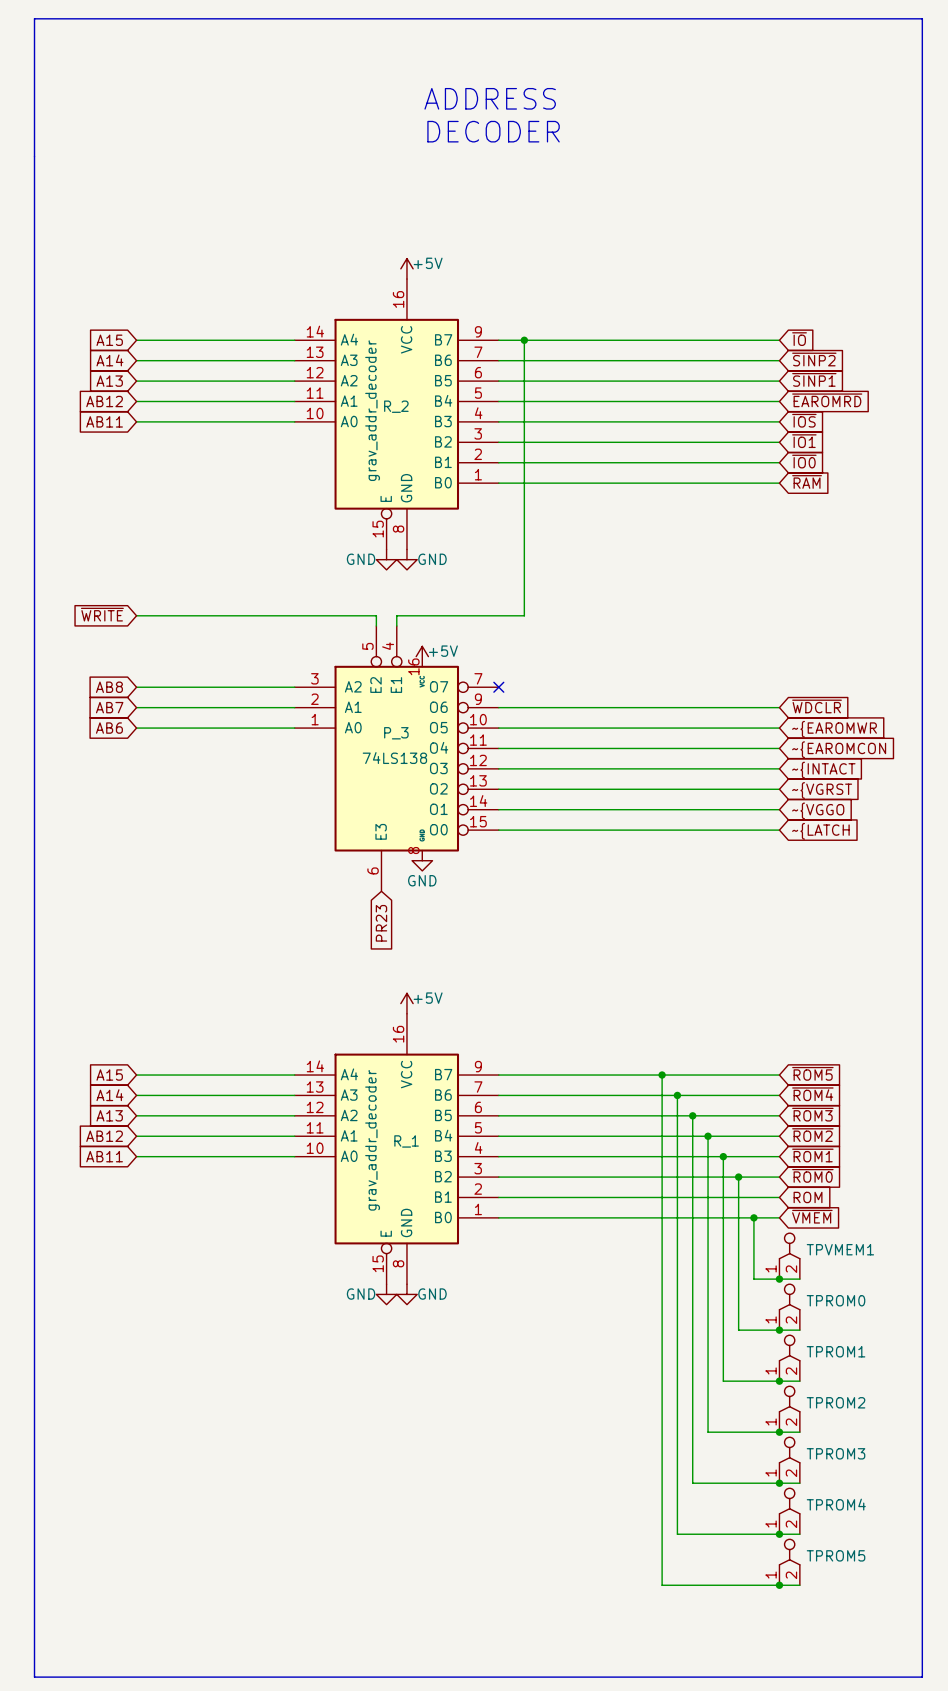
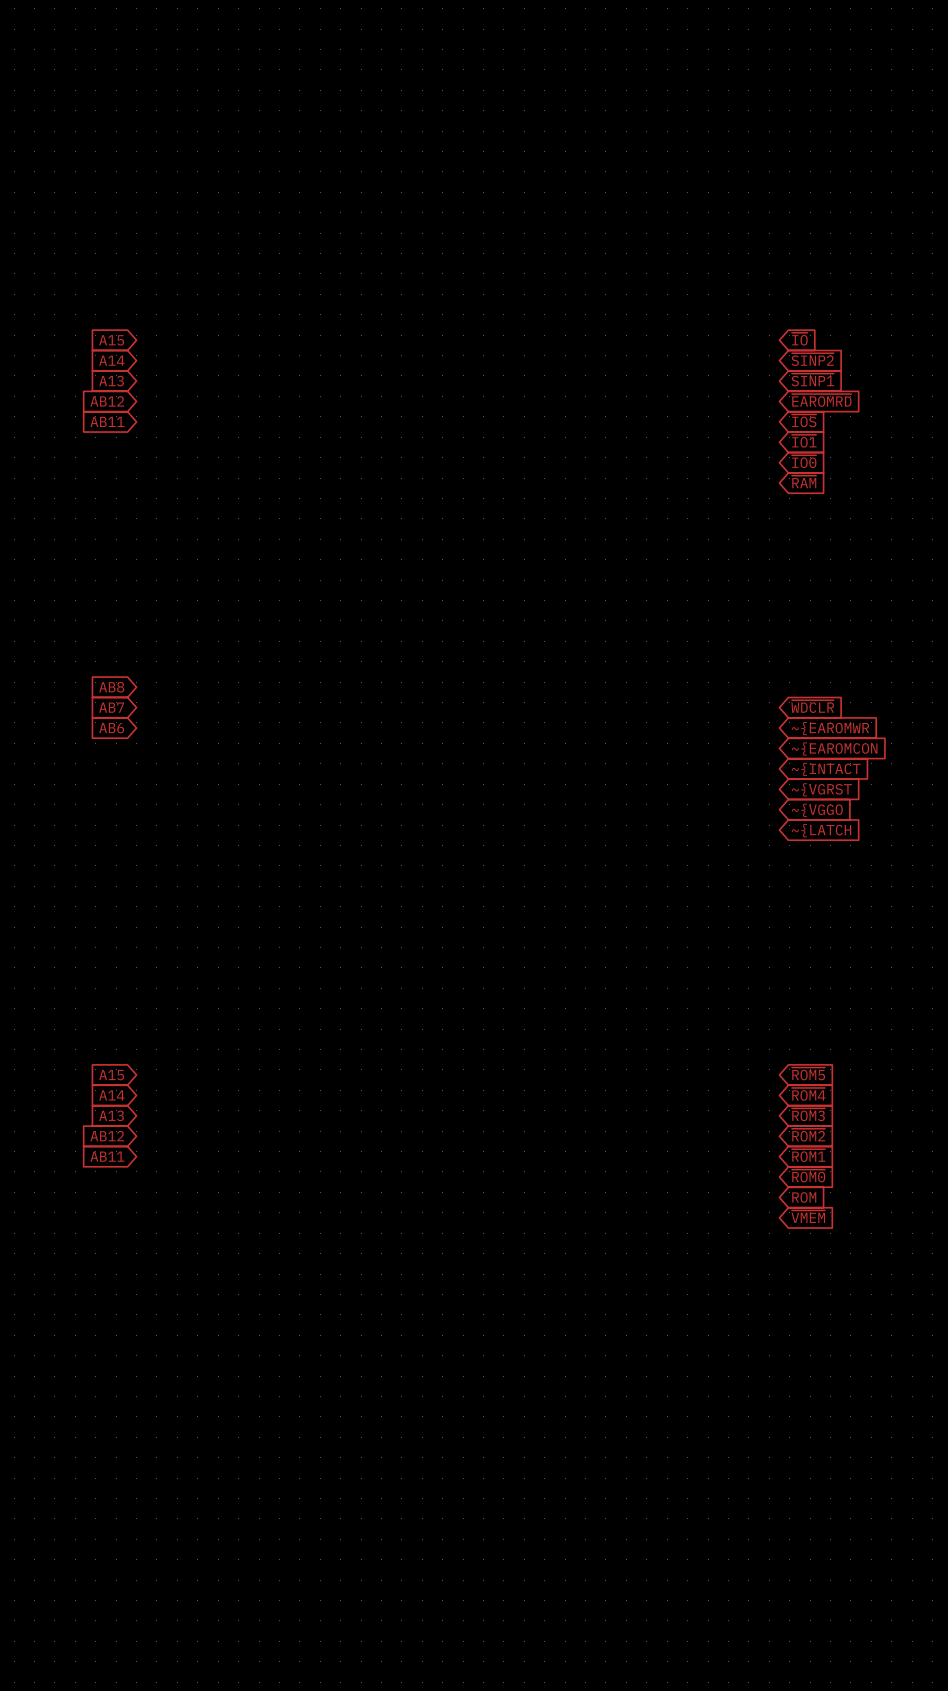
line: (34, 18) (34, 1677) (922, 1677) (922, 18) (34, 18) -> none
text: ADDRESS (490, 98) -> none
text: DECODER (493, 131) -> none
power symbol: +5V (406, 268) -> none
wire: (136, 340) (294, 340) -> none
wire: (498, 340) (779, 340) -> none
wire: (524, 340) (524, 615) (396, 615) (396, 626) -> none
junction: (524, 340) -> none
wire: (136, 360) (294, 360) -> none
wire: (498, 360) (779, 360) -> none
wire: (136, 381) (294, 381) -> none
wire: (498, 381) (779, 381) -> none
wire: (136, 401) (294, 401) -> none
wire: (498, 401) (779, 401) -> none
R_2: grav_addr_decoder (396, 414) -> none
wire: (136, 421) (294, 421) -> none
wire: (498, 421) (779, 421) -> none
wire: (498, 442) (779, 442) -> none
wire: (498, 462) (779, 462) -> none
wire: (498, 483) (779, 483) -> none
power symbol: GND (386, 559) -> none
power symbol: GND (406, 559) -> none
global label: ~{WRITE} (102, 614) -> none
wire: (136, 615) (376, 615) (376, 626) -> none
power symbol: +5V (422, 656) -> none
wire: (136, 687) (294, 687) -> none
no-connect mark: (498, 687) -> none
wire: (136, 707) (294, 707) -> none
wire: (498, 707) (779, 707) -> none
wire: (136, 728) (294, 728) -> none
wire: (498, 728) (779, 728) -> none
wire: (498, 748) (779, 748) -> none
P_3: 74LS138 (396, 758) -> none
wire: (498, 768) (779, 768) -> none
wire: (498, 789) (779, 789) -> none
wire: (498, 809) (779, 809) -> none
wire: (498, 830) (779, 830) -> none
power symbol: GND (422, 860) -> none
global label: PR23 (381, 923) -> none
power symbol: +5V (406, 1003) -> none
wire: (136, 1075) (294, 1075) -> none
wire: (498, 1075) (779, 1075) -> none
wire: (662, 1075) (662, 1585) (799, 1585) -> none
junction: (662, 1075) -> none
wire: (136, 1095) (294, 1095) -> none
wire: (498, 1095) (779, 1095) -> none
wire: (677, 1095) (677, 1534) (799, 1534) -> none
junction: (677, 1095) -> none
wire: (136, 1115) (294, 1115) -> none
wire: (498, 1115) (779, 1115) -> none
wire: (692, 1115) (692, 1483) (799, 1483) -> none
junction: (692, 1115) -> none
wire: (136, 1136) (294, 1136) -> none
wire: (498, 1136) (779, 1136) -> none
wire: (708, 1136) (708, 1432) (799, 1432) -> none
junction: (708, 1136) -> none
R_1: grav_addr_decoder (396, 1149) -> none
wire: (136, 1156) (294, 1156) -> none
wire: (498, 1156) (779, 1156) -> none
wire: (723, 1156) (723, 1381) (799, 1381) -> none
junction: (723, 1156) -> none
wire: (498, 1177) (779, 1177) -> none
wire: (738, 1177) (738, 1330) (799, 1330) -> none
junction: (738, 1177) -> none
wire: (498, 1197) (779, 1197) -> none
wire: (498, 1217) (779, 1217) -> none
wire: (753, 1217) (753, 1279) (799, 1279) -> none
junction: (753, 1217) -> none
TPVMEM1: (789, 1256) -> none
junction: (779, 1279) -> none
power symbol: GND (386, 1294) -> none
power symbol: GND (406, 1294) -> none
TPROM0: (789, 1307) -> none
junction: (779, 1330) -> none
TPROM1: (789, 1358) -> none
junction: (779, 1381) -> none
TPROM2: (789, 1409) -> none
junction: (779, 1432) -> none
TPROM3: (789, 1460) -> none
junction: (779, 1483) -> none
TPROM4: (789, 1511) -> none
junction: (779, 1534) -> none
TPROM5: (789, 1562) -> none
junction: (779, 1585) -> none

